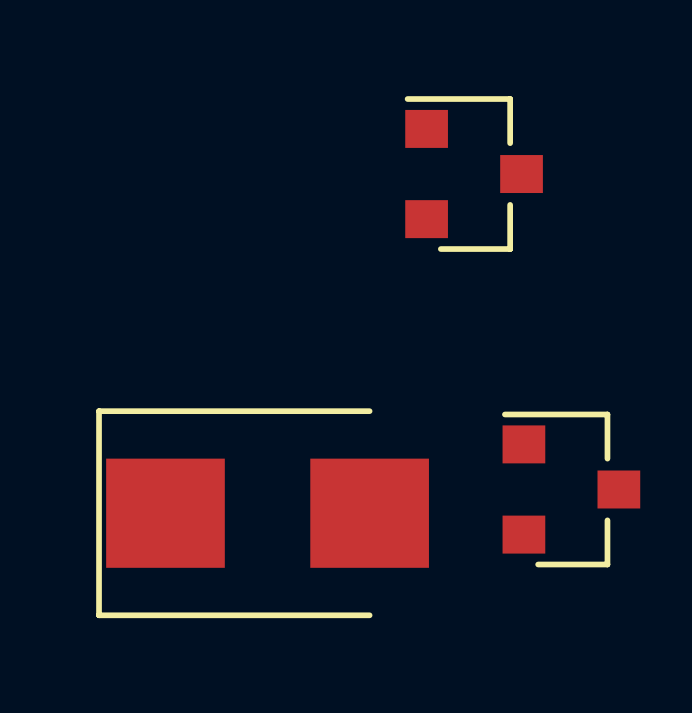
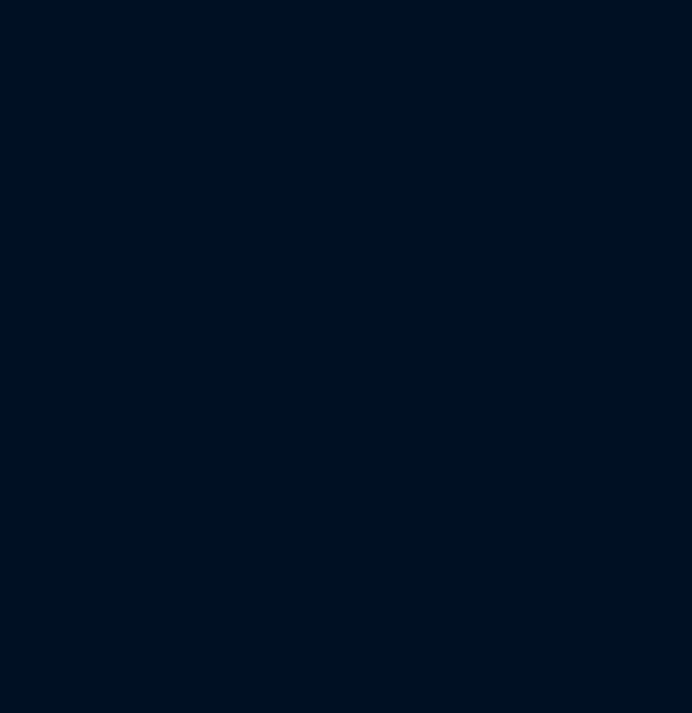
part: (473, 174) -> none
part: (571, 489) -> none
part: (262, 513) -> none

